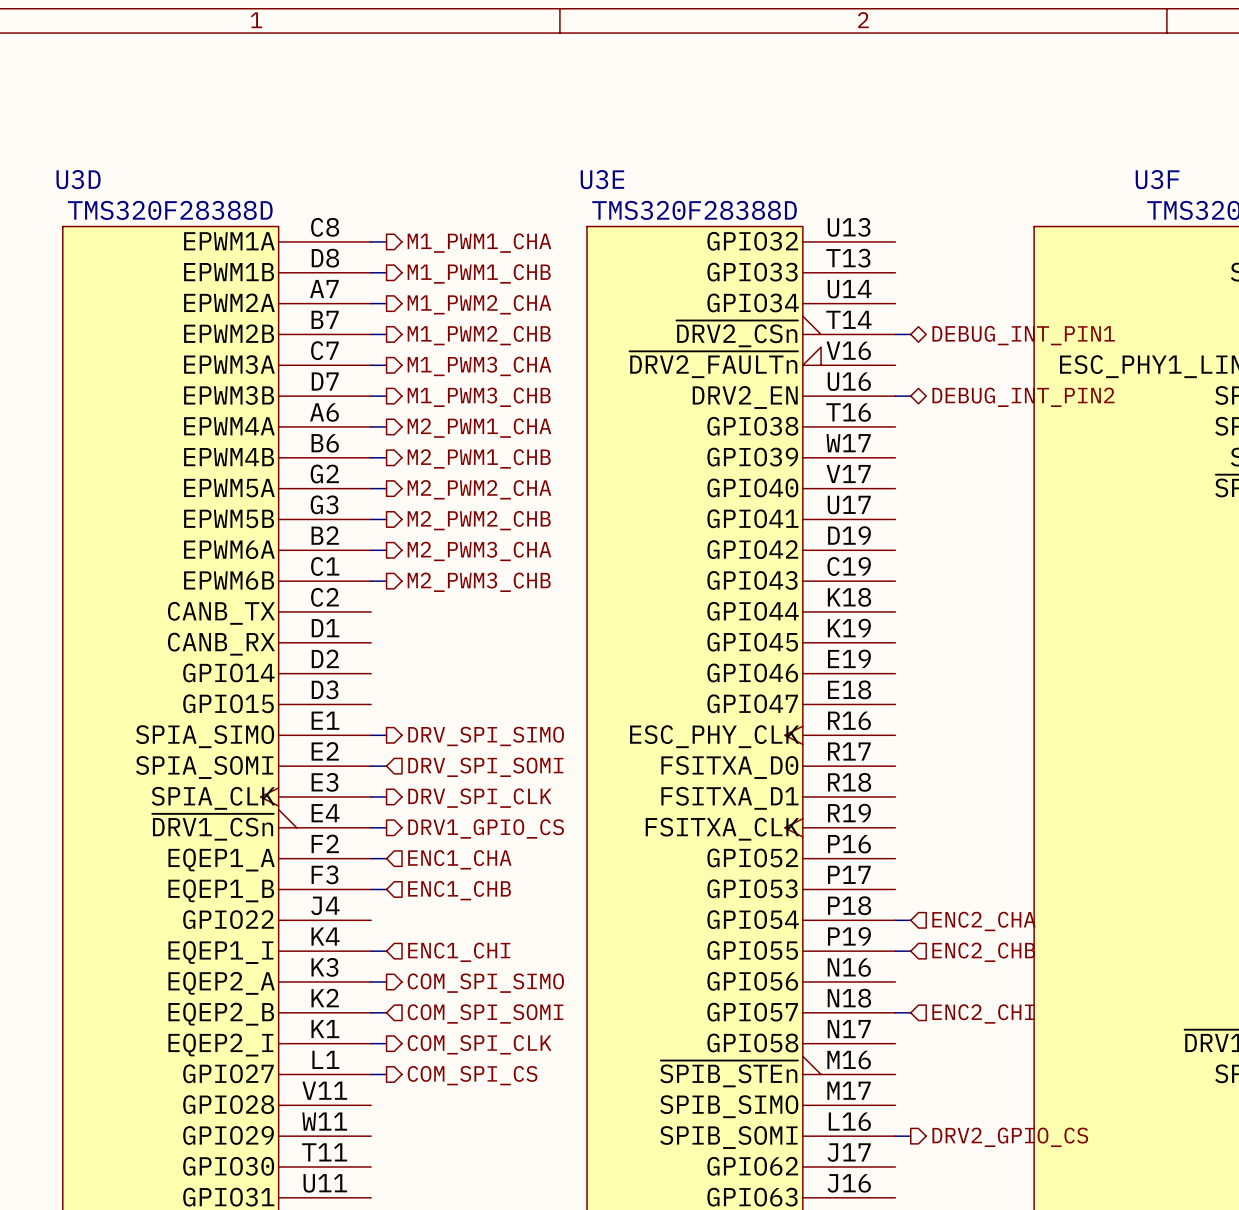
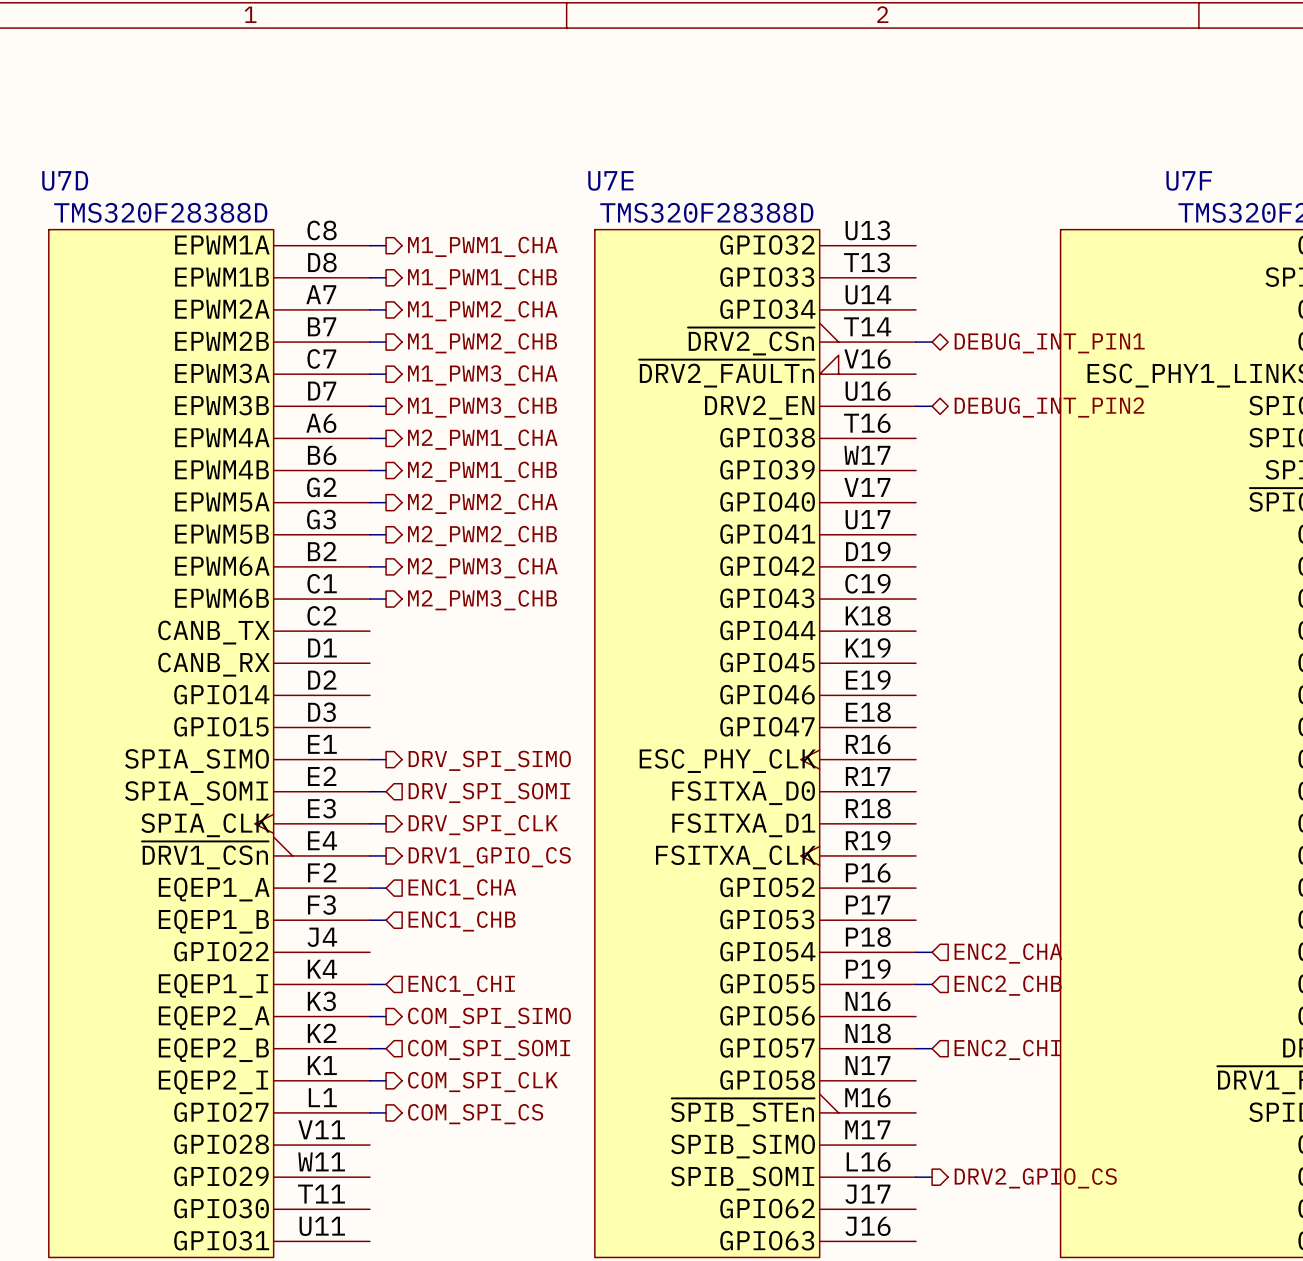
U3D name: U3D (78, 179) -> U7D (65, 180)
U3E name: U3E (602, 179) -> U7E (610, 180)
U3F name: U3F (1157, 179) -> U7F (1189, 180)

